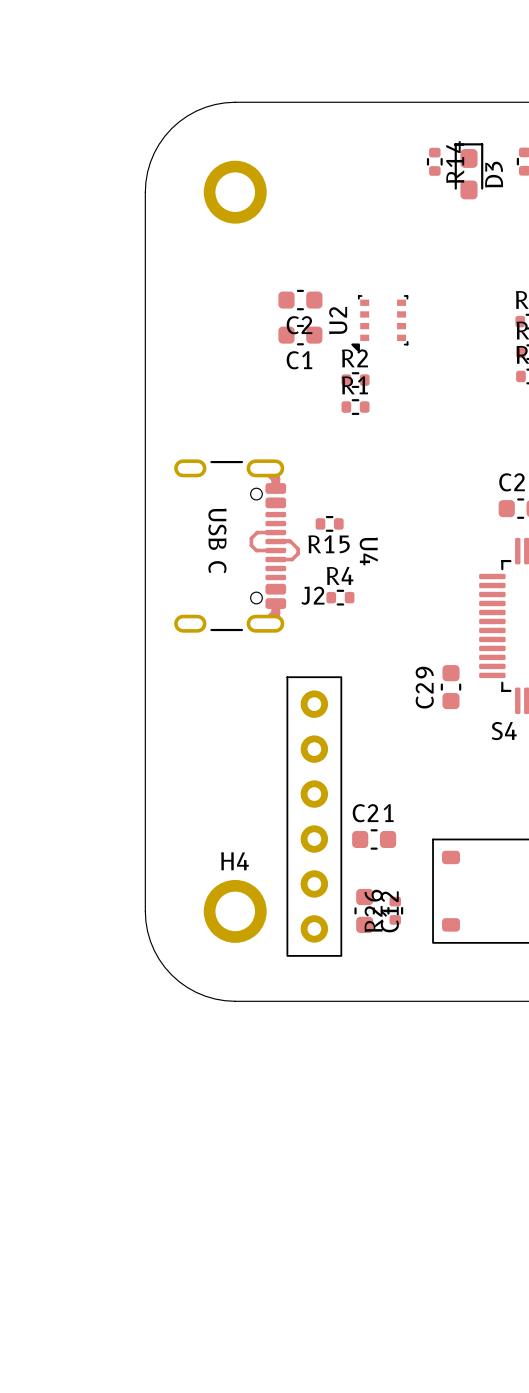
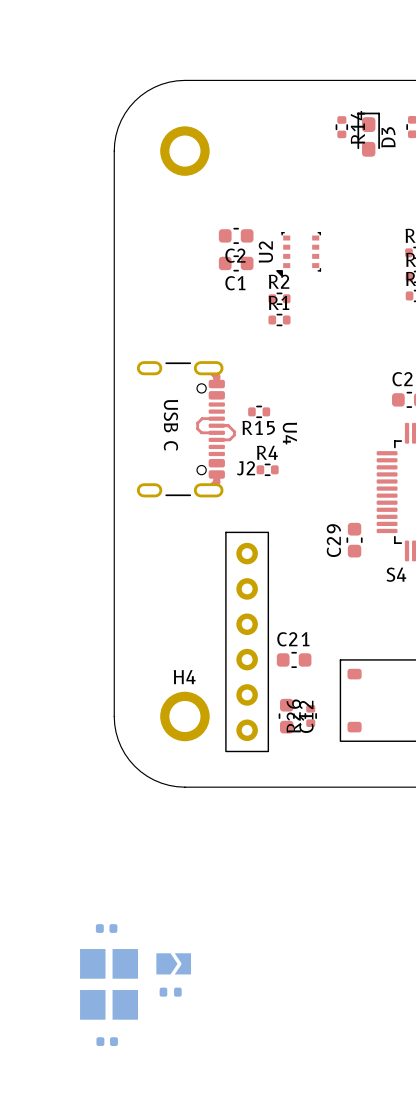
part: none -> (106, 928)
part: none -> (173, 963)
part: none -> (109, 984)
part: none -> (170, 992)
part: none -> (107, 1041)

